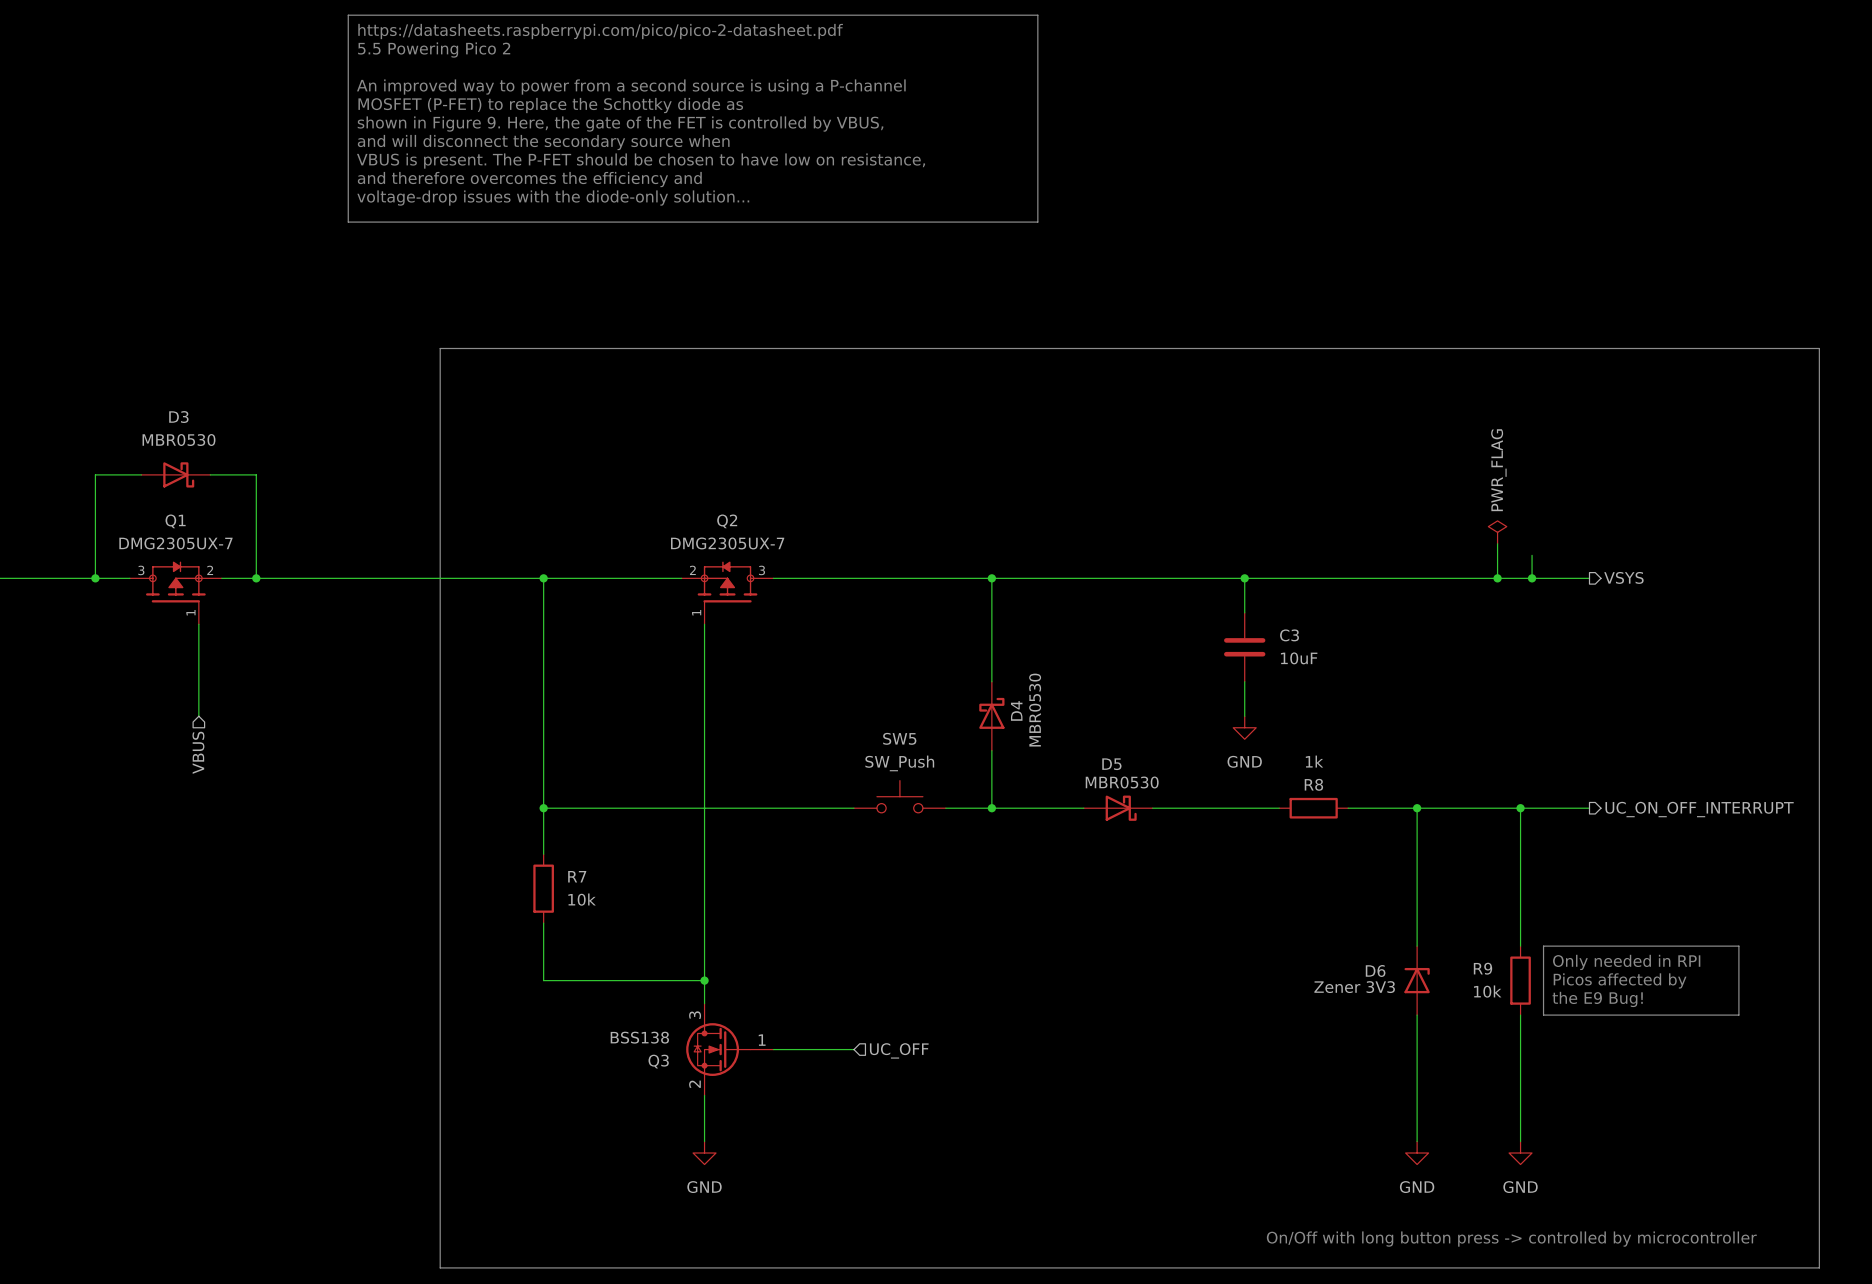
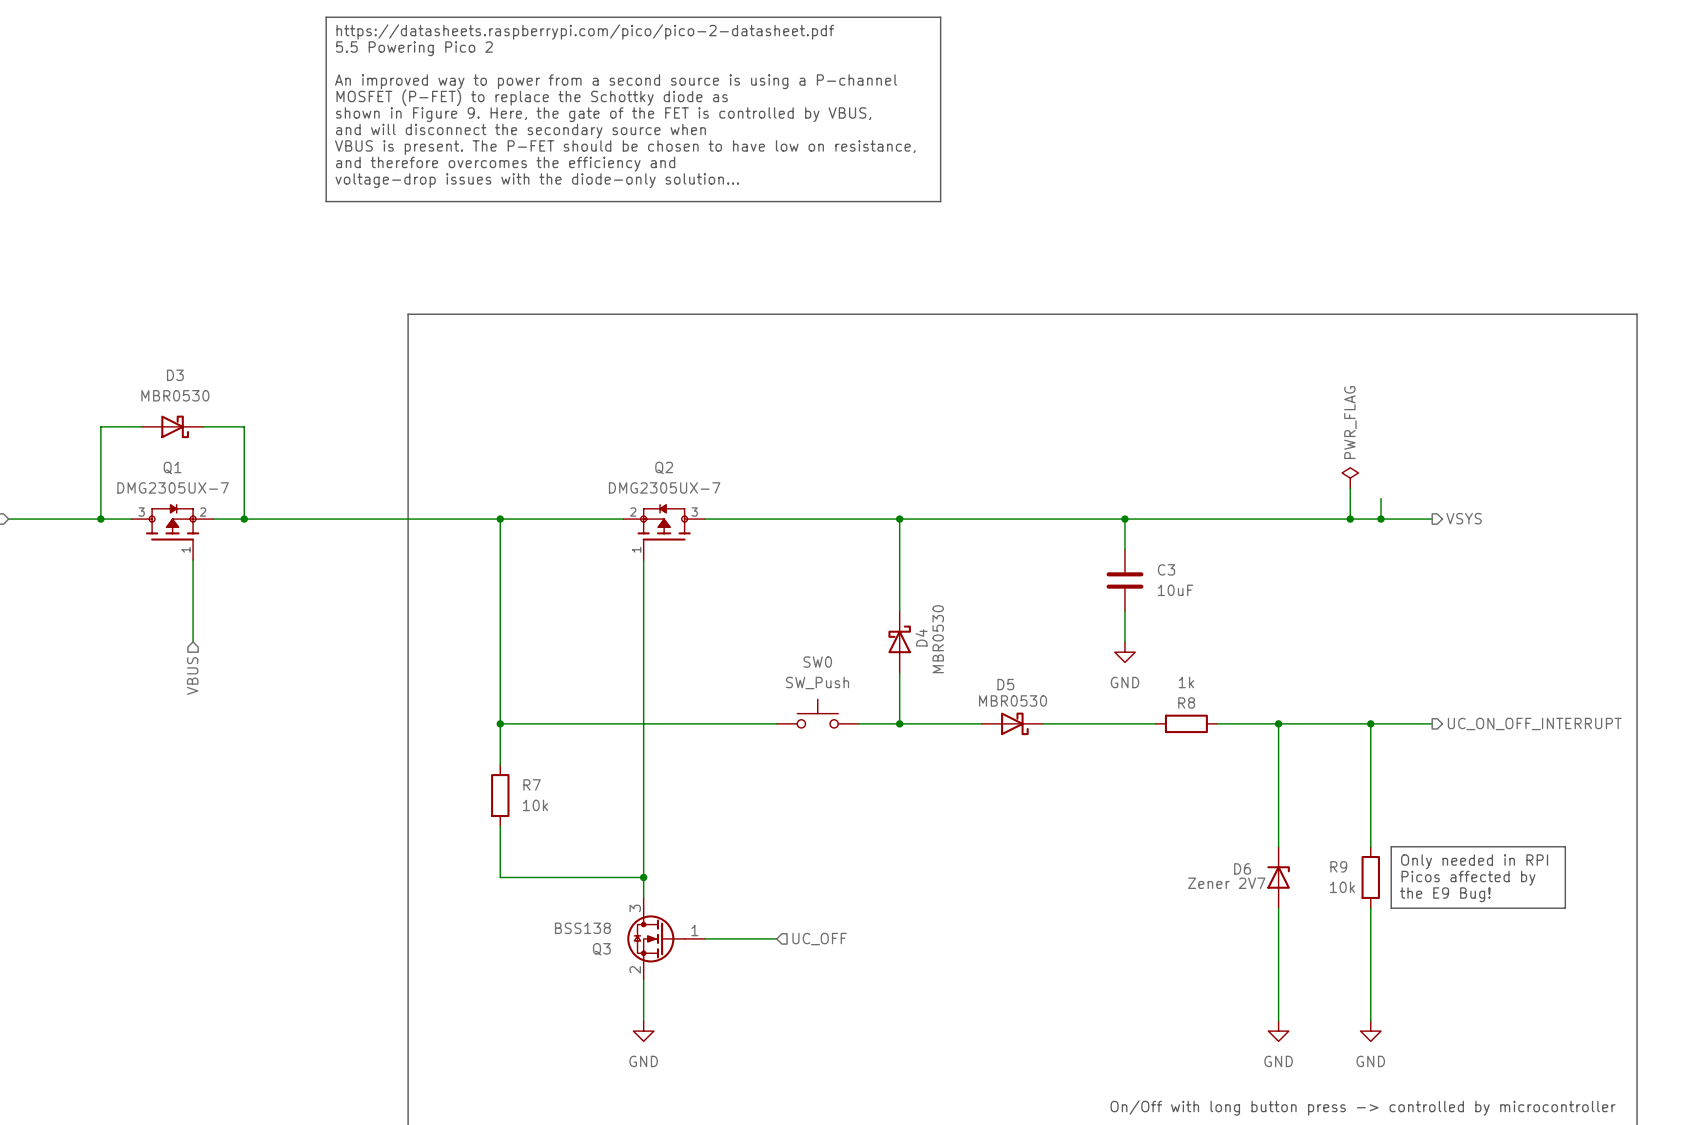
SW5 name: SW5 (899, 738) -> SW0 (817, 662)
D6 value: Zener 3V3 (1354, 987) -> Zener 2V7 (1226, 883)

